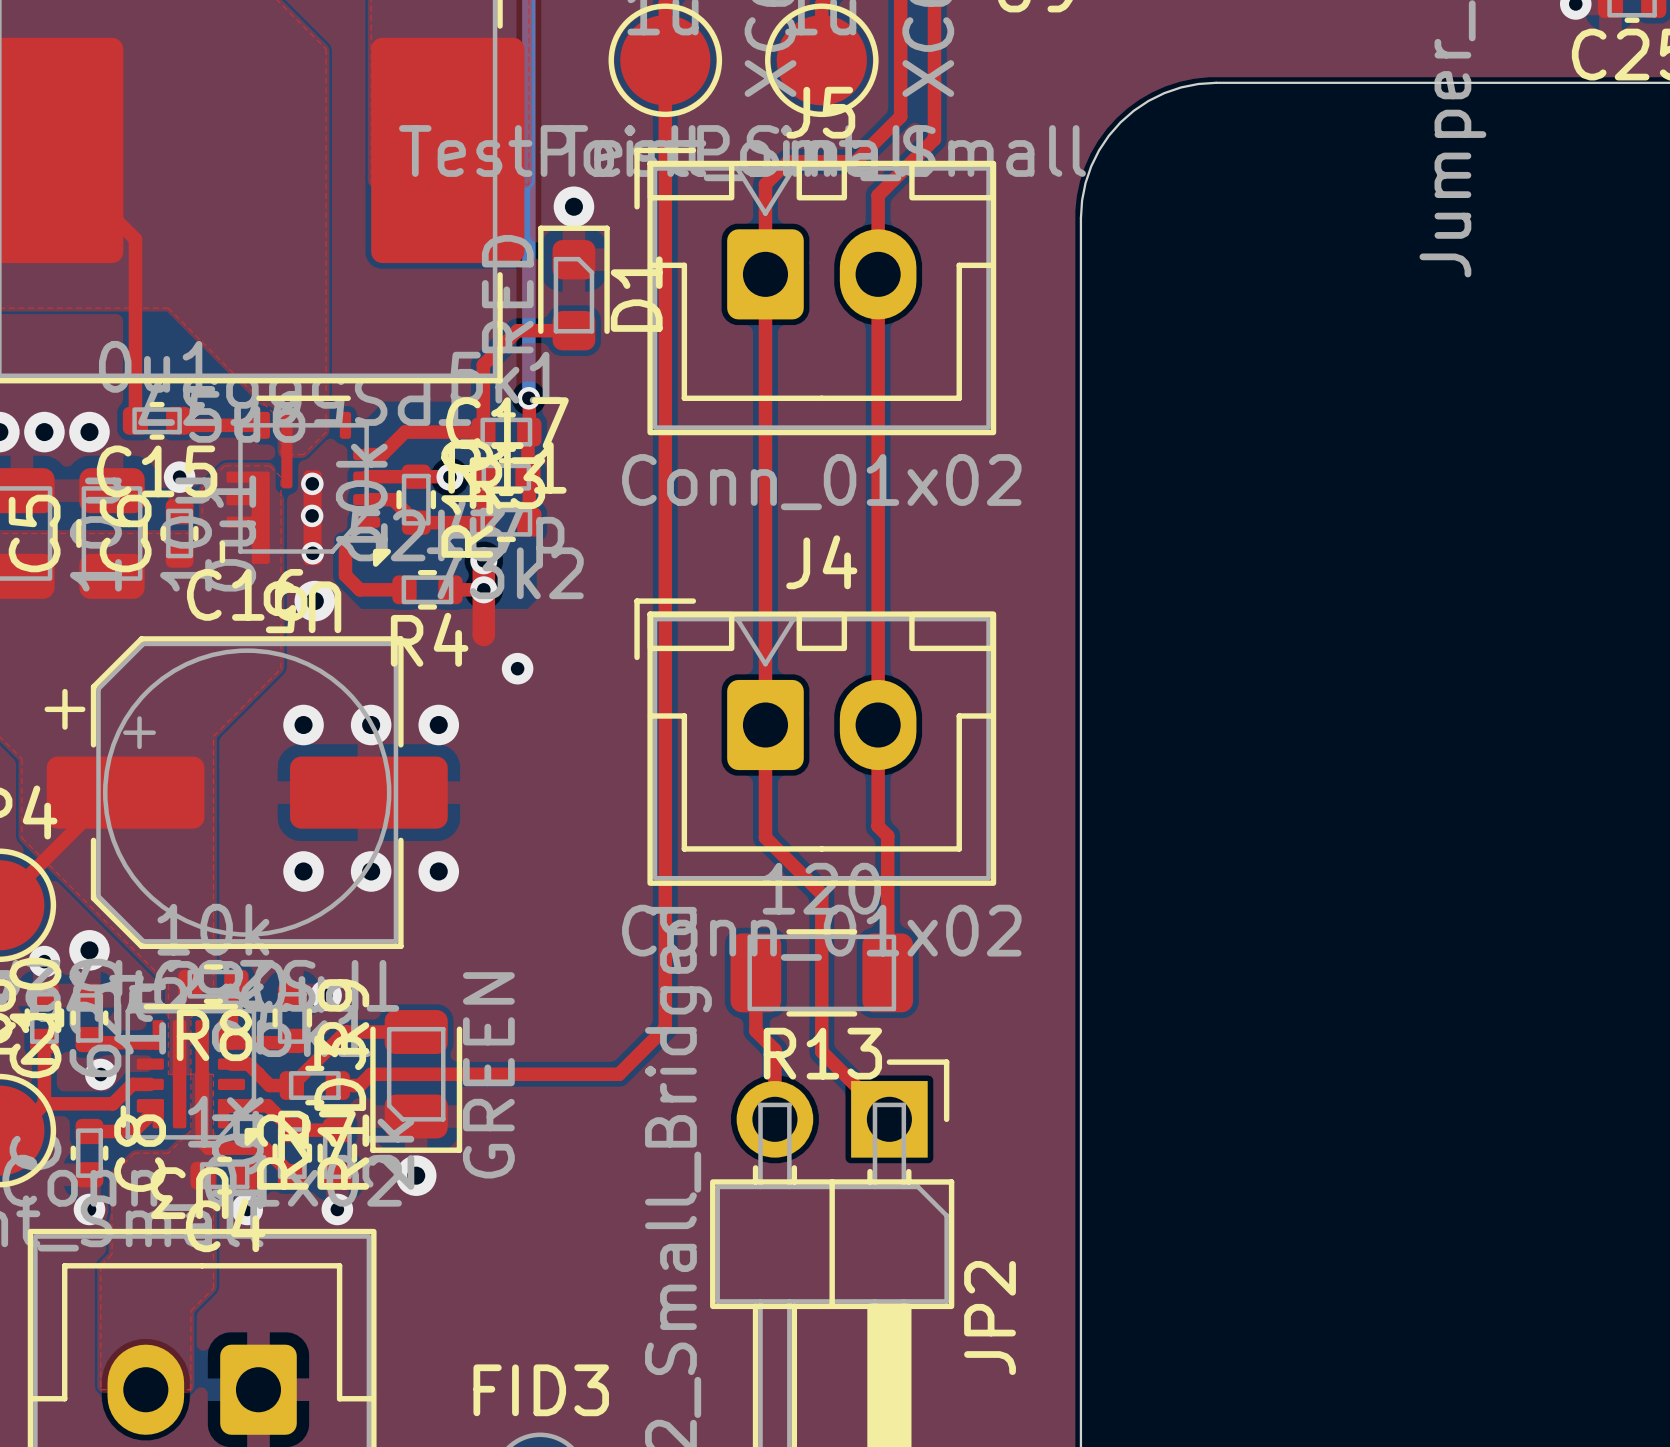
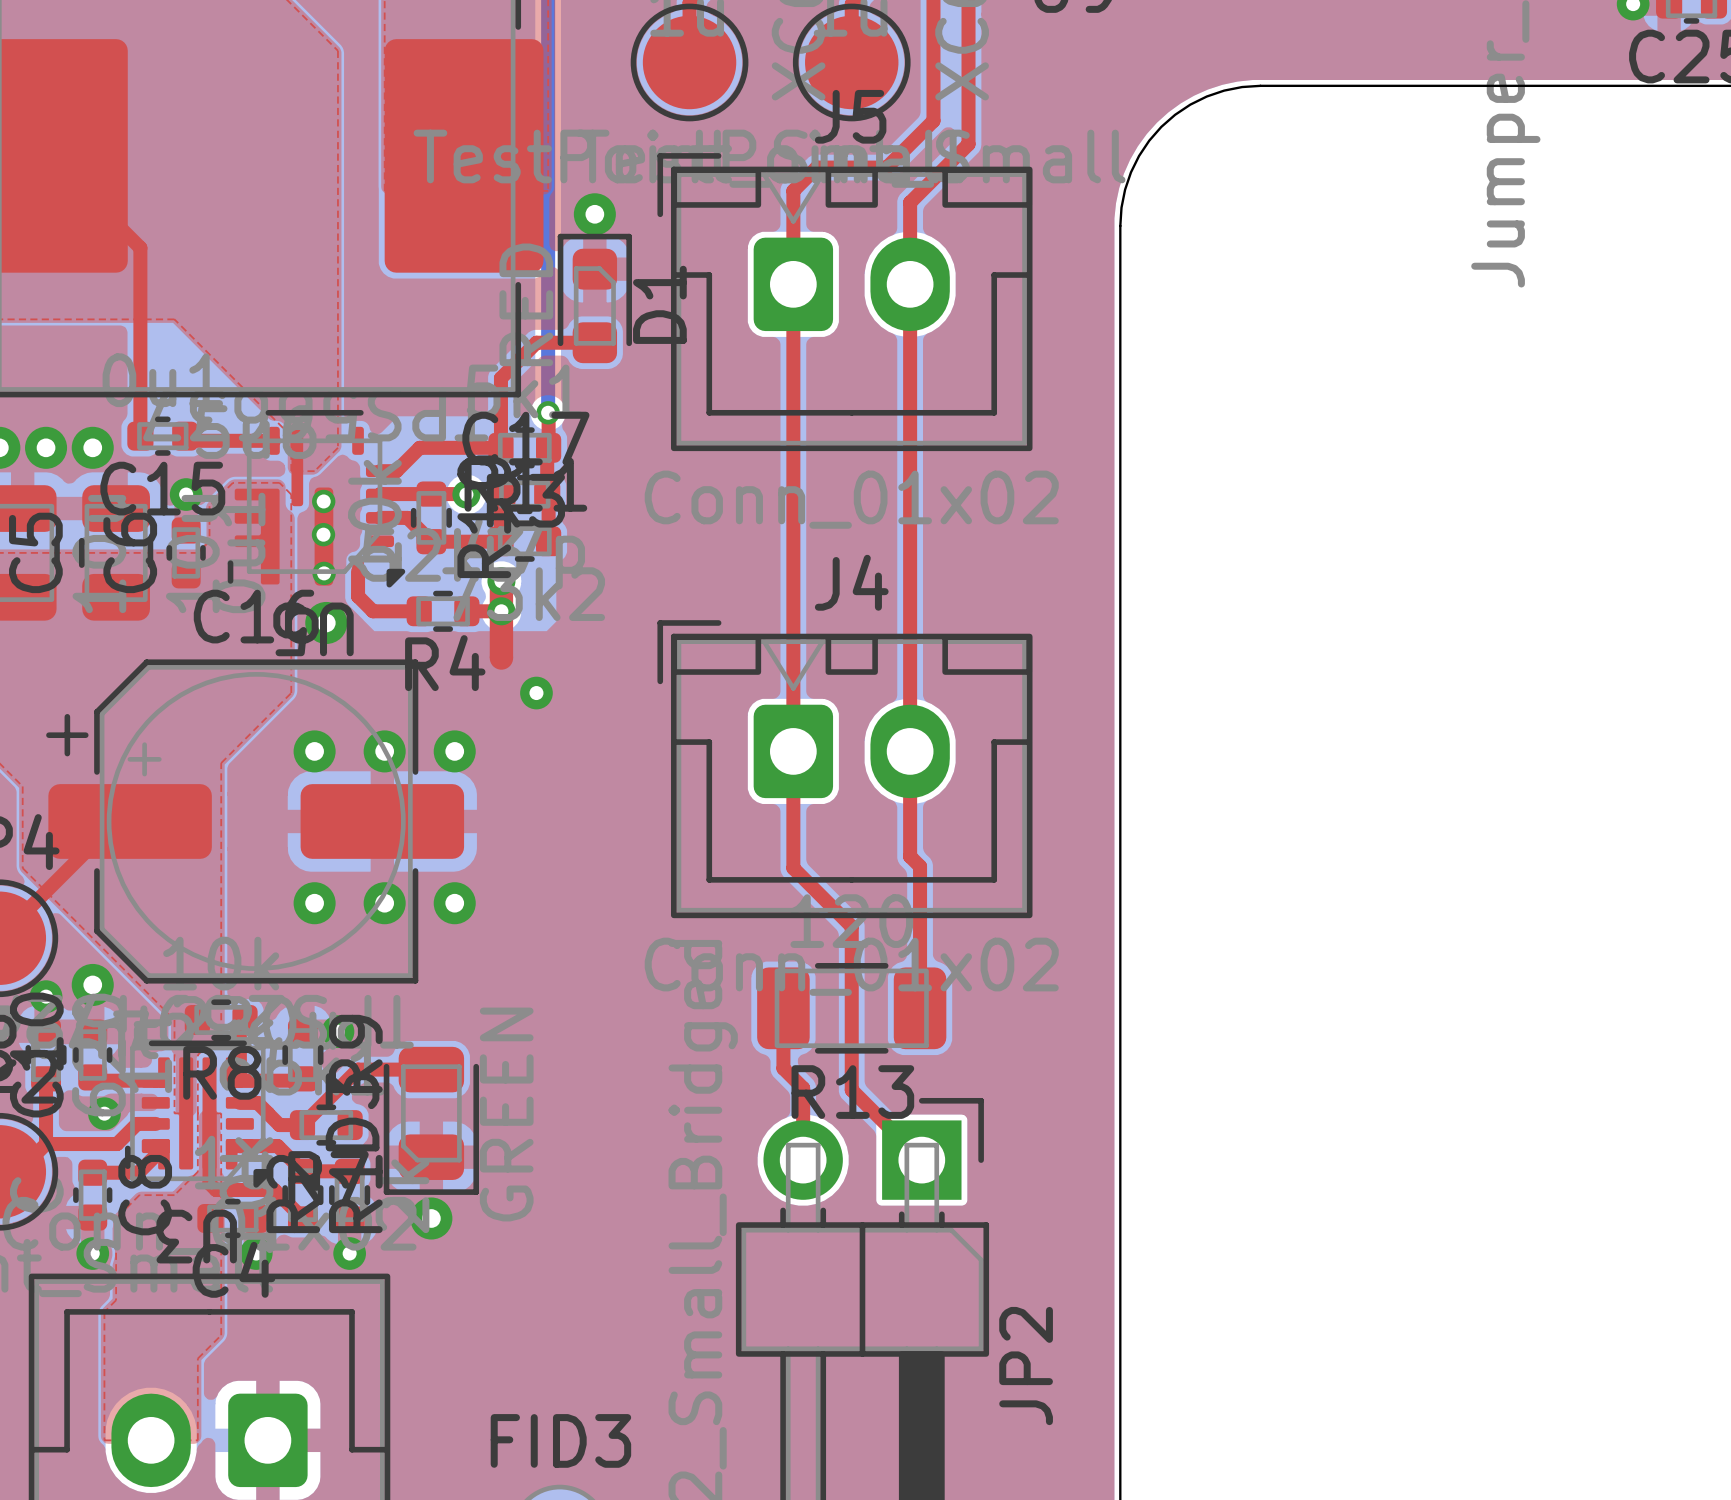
top track: (665, 60) (665, 1027) (619, 1074) (371, 1074) (359, 1085) (337, 1085) -> none

